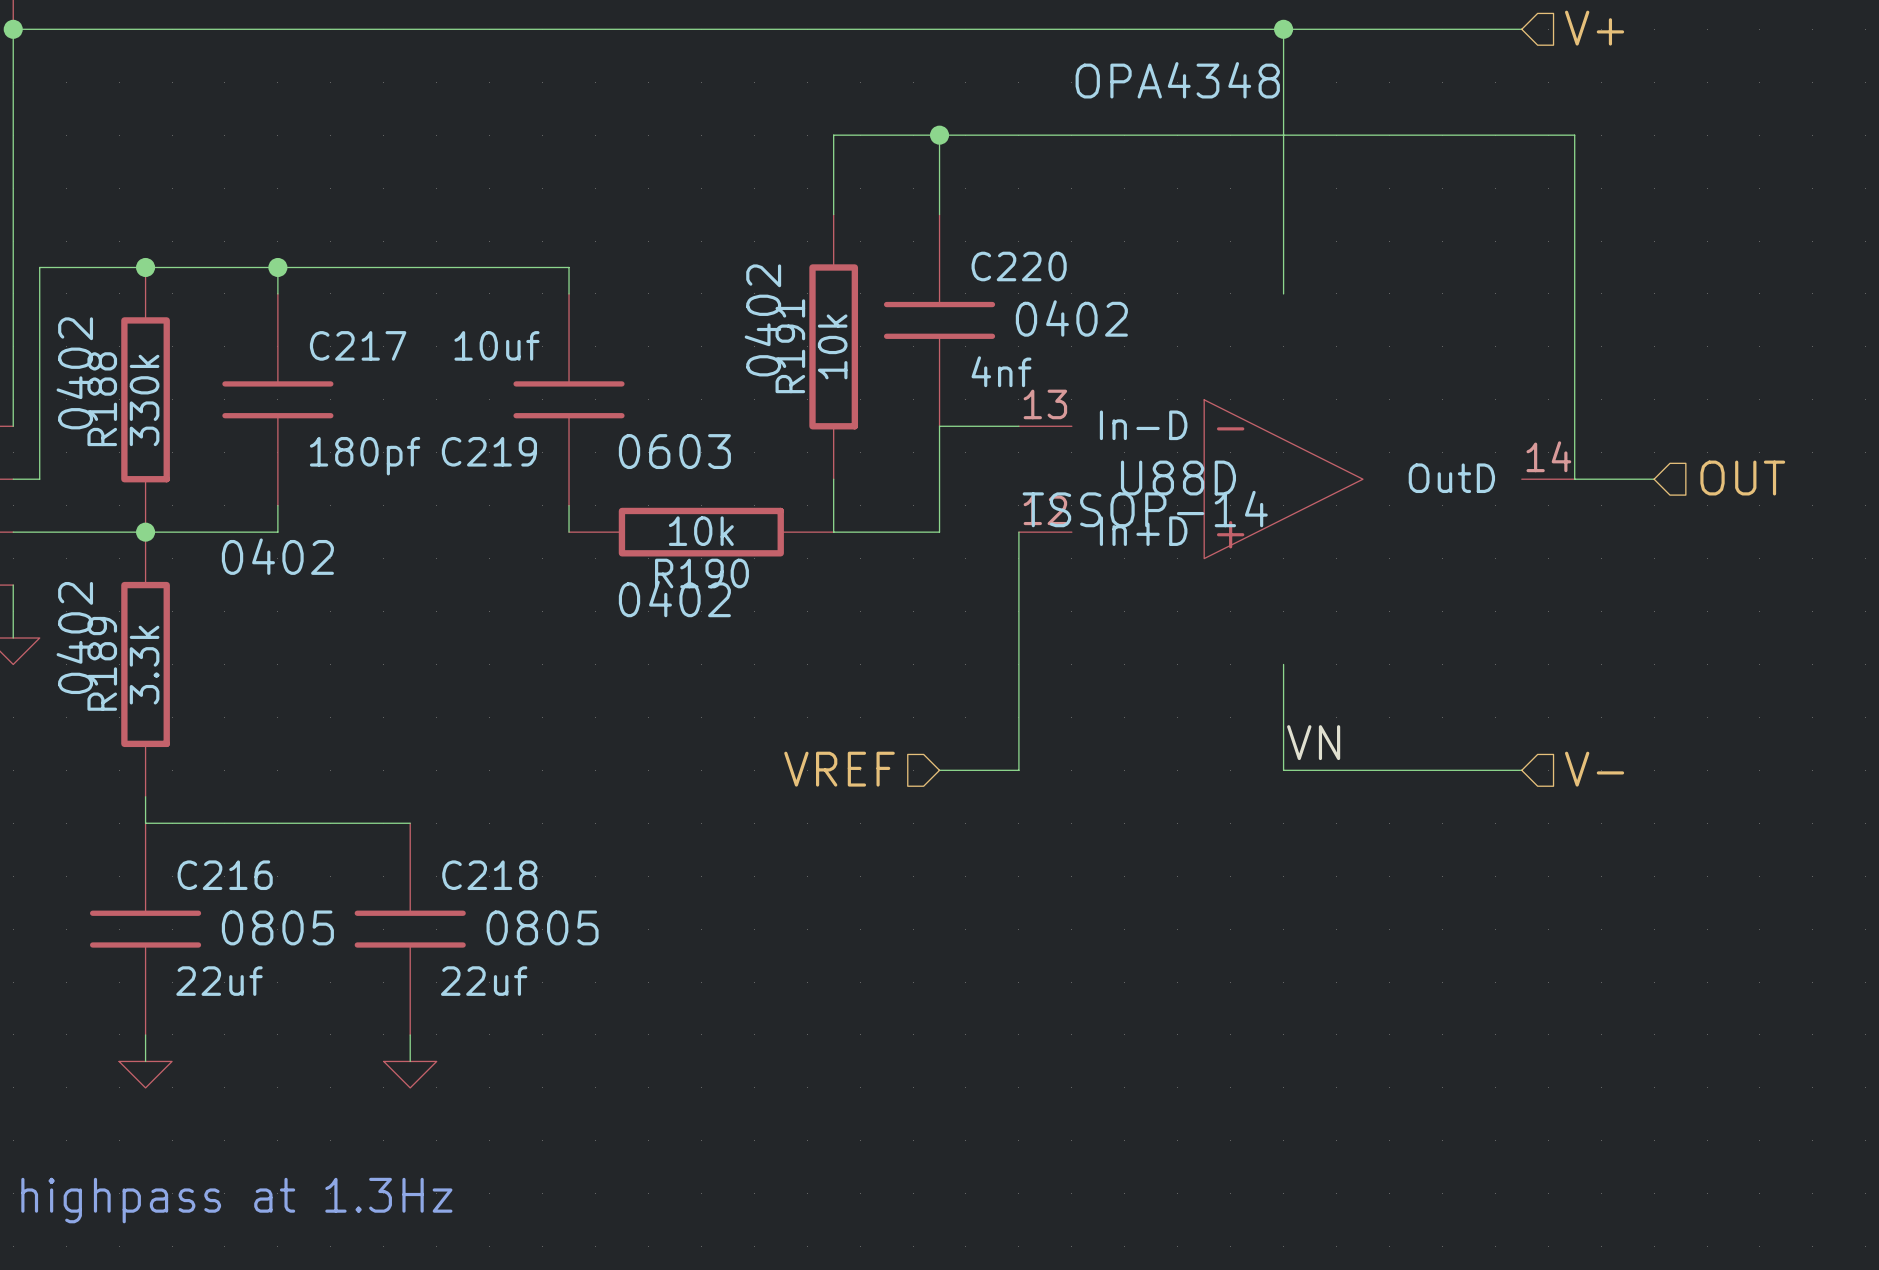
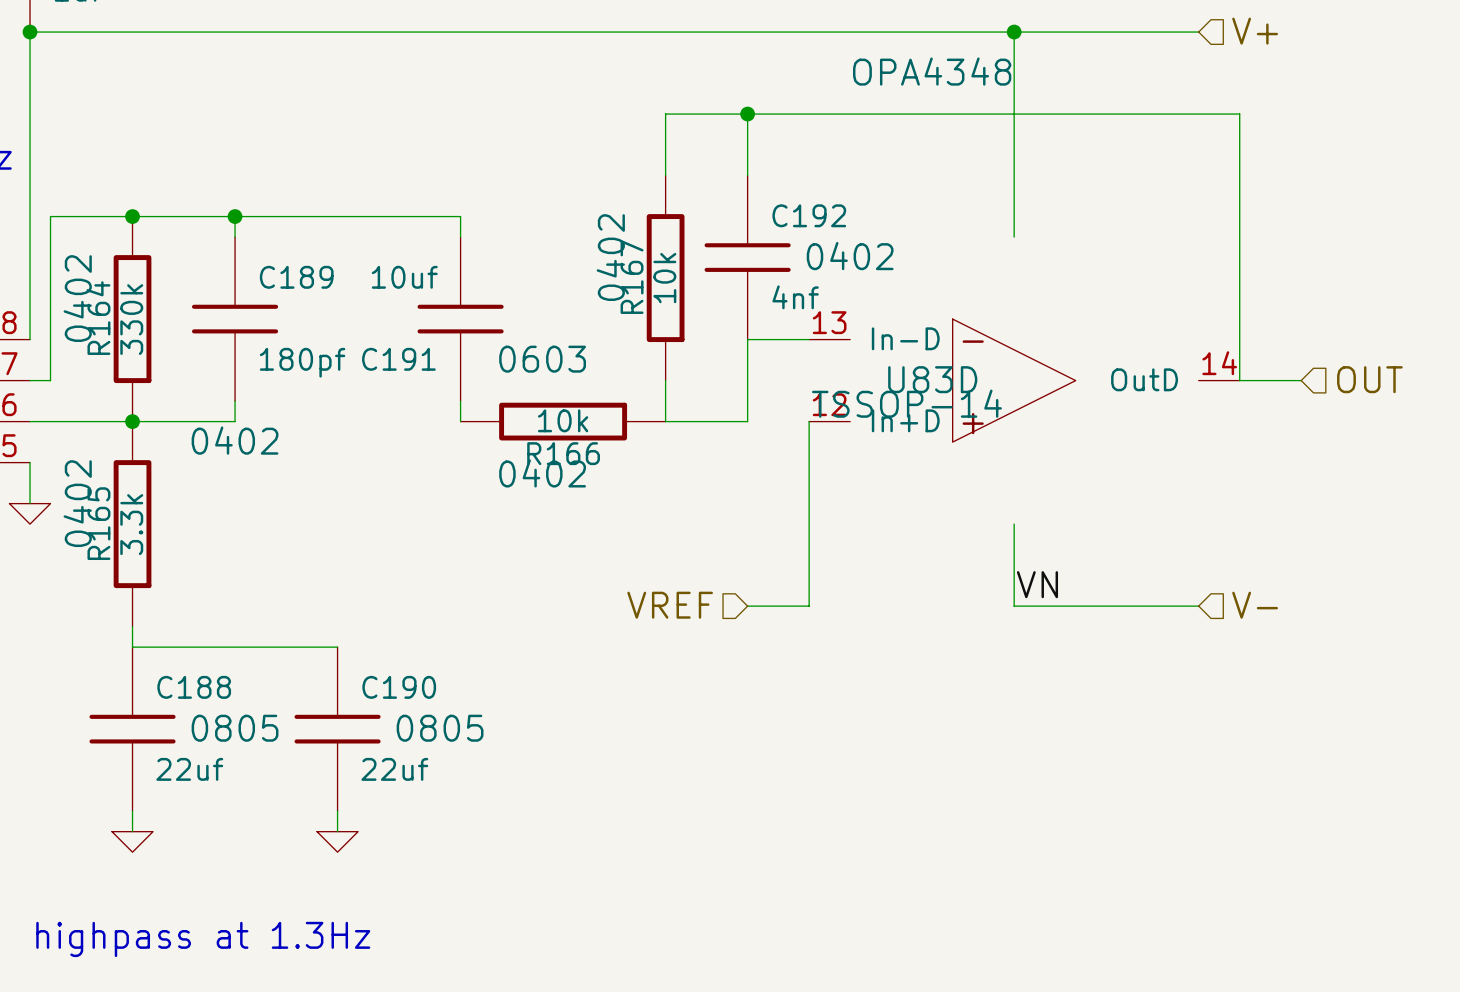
C220 name: C220 (1019, 266) -> C192 (809, 215)
C217 name: C217 (358, 345) -> C189 (296, 277)
R191 name: R191 (790, 346) -> R167 (632, 277)
R188 name: R188 (102, 399) -> R164 (98, 318)
C219 name: C219 (489, 451) -> C191 (398, 359)
U88D name: U88D (1178, 478) -> U83D (932, 379)
R190 name: R190 (701, 573) -> R166 (563, 453)
R189 name: R189 (102, 663) -> R165 (98, 523)
C216 name: C216 (225, 875) -> C188 (194, 687)
C218 name: C218 (489, 875) -> C190 (399, 687)

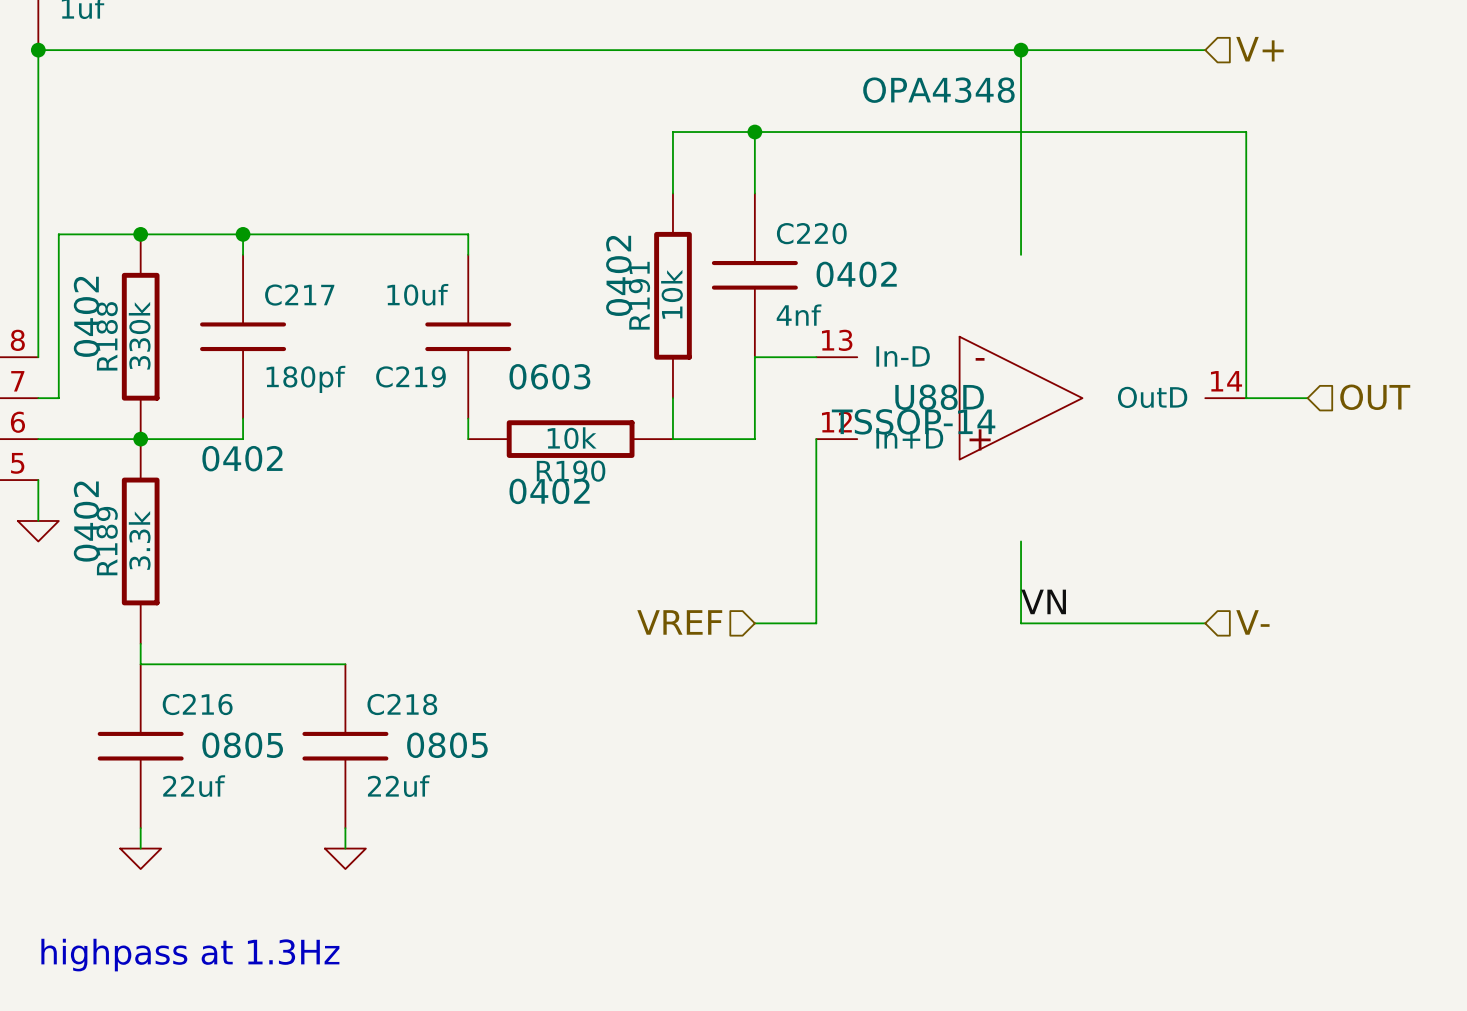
C192 name: C192 (809, 215) -> C220 (811, 233)
C189 name: C189 (296, 277) -> C217 (299, 295)
R167 name: R167 (632, 277) -> R191 (639, 295)
R164 name: R164 (98, 318) -> R188 (107, 336)
C191 name: C191 (398, 359) -> C219 (410, 376)
U83D name: U83D (932, 379) -> U88D (939, 397)
R166 name: R166 (563, 453) -> R190 (571, 471)
R165 name: R165 (98, 523) -> R189 (107, 541)
C188 name: C188 (194, 687) -> C216 (197, 704)
C190 name: C190 (399, 687) -> C218 (402, 704)

